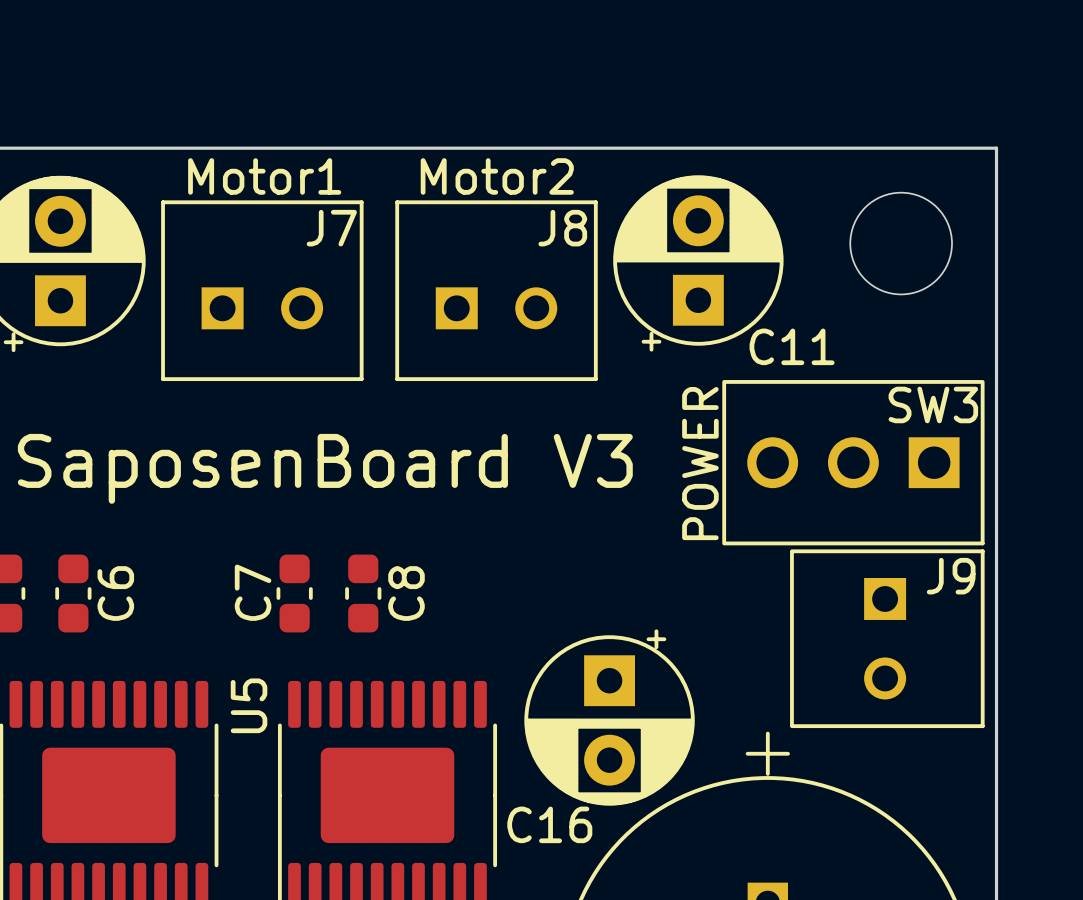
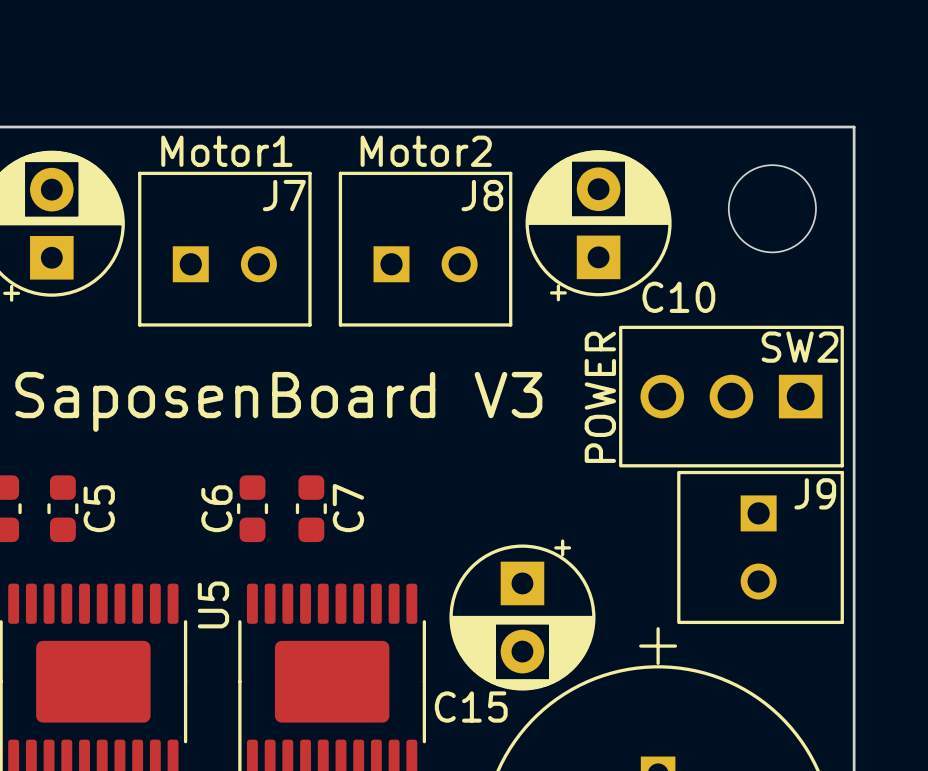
C11 name: C11 (792, 346) -> C10 (678, 297)
SW3 name: SW3 (933, 404) -> SW2 (800, 347)
C7 name: C7 (253, 592) -> C6 (216, 508)
C6 name: C6 (115, 593) -> C5 (99, 508)
C8 name: C8 (406, 593) -> C7 (348, 508)
C16 name: C16 (549, 824) -> C15 (471, 707)

